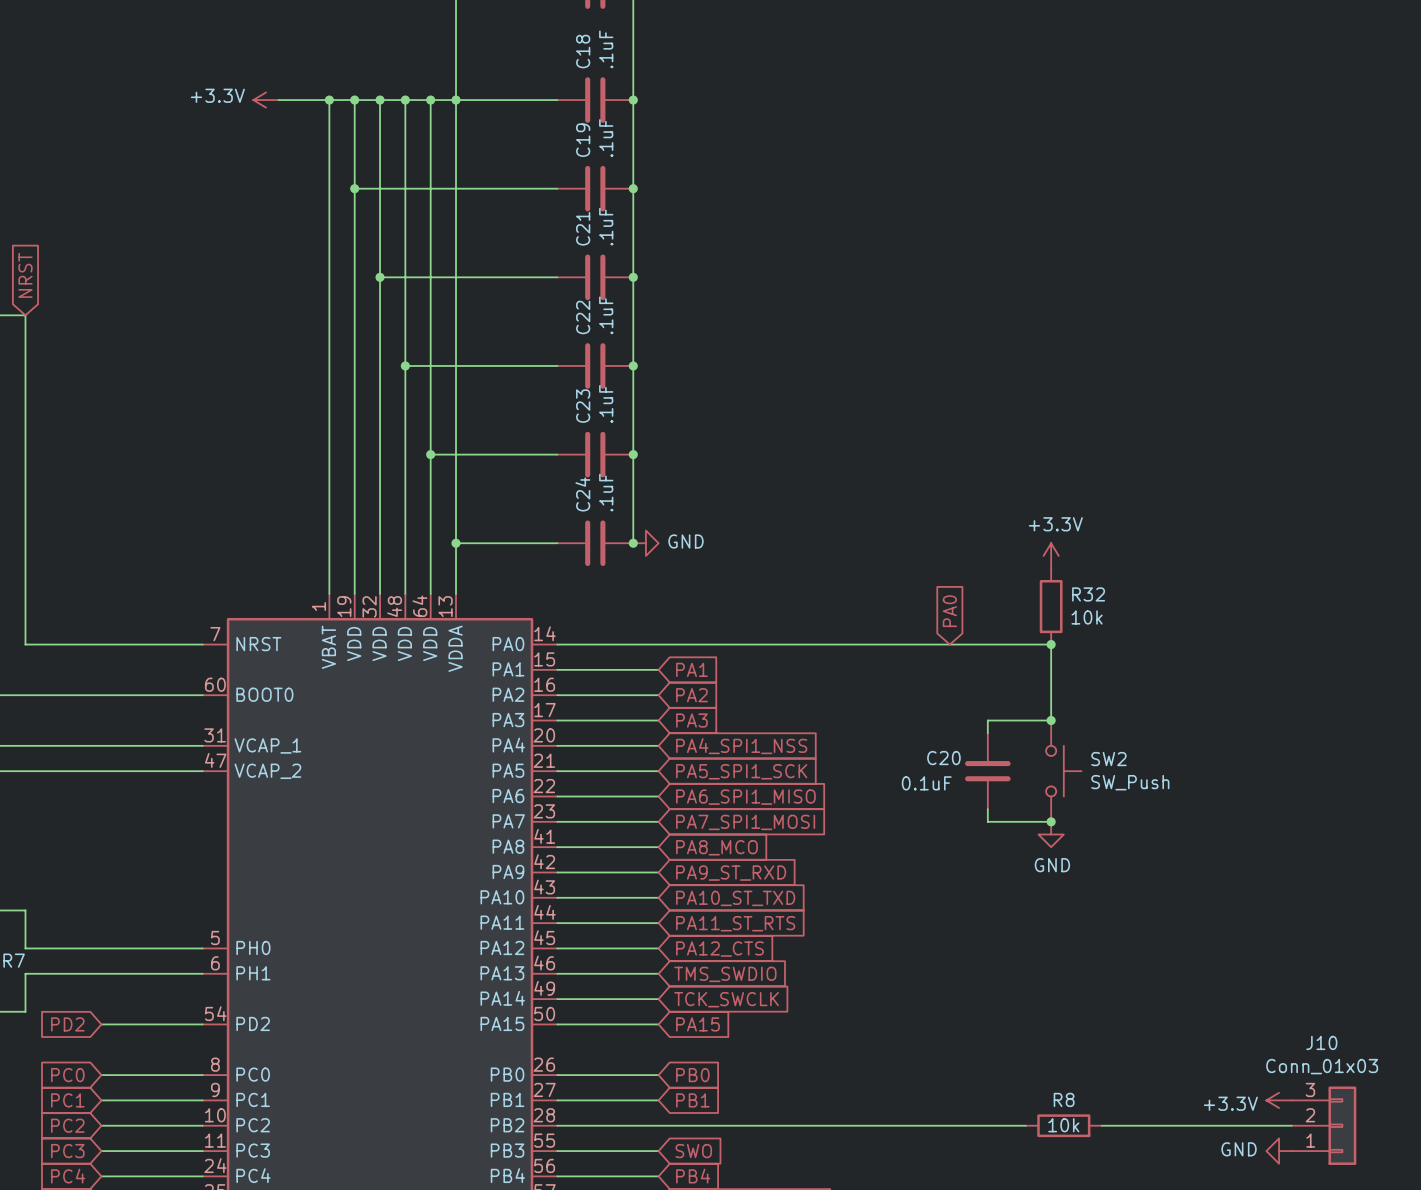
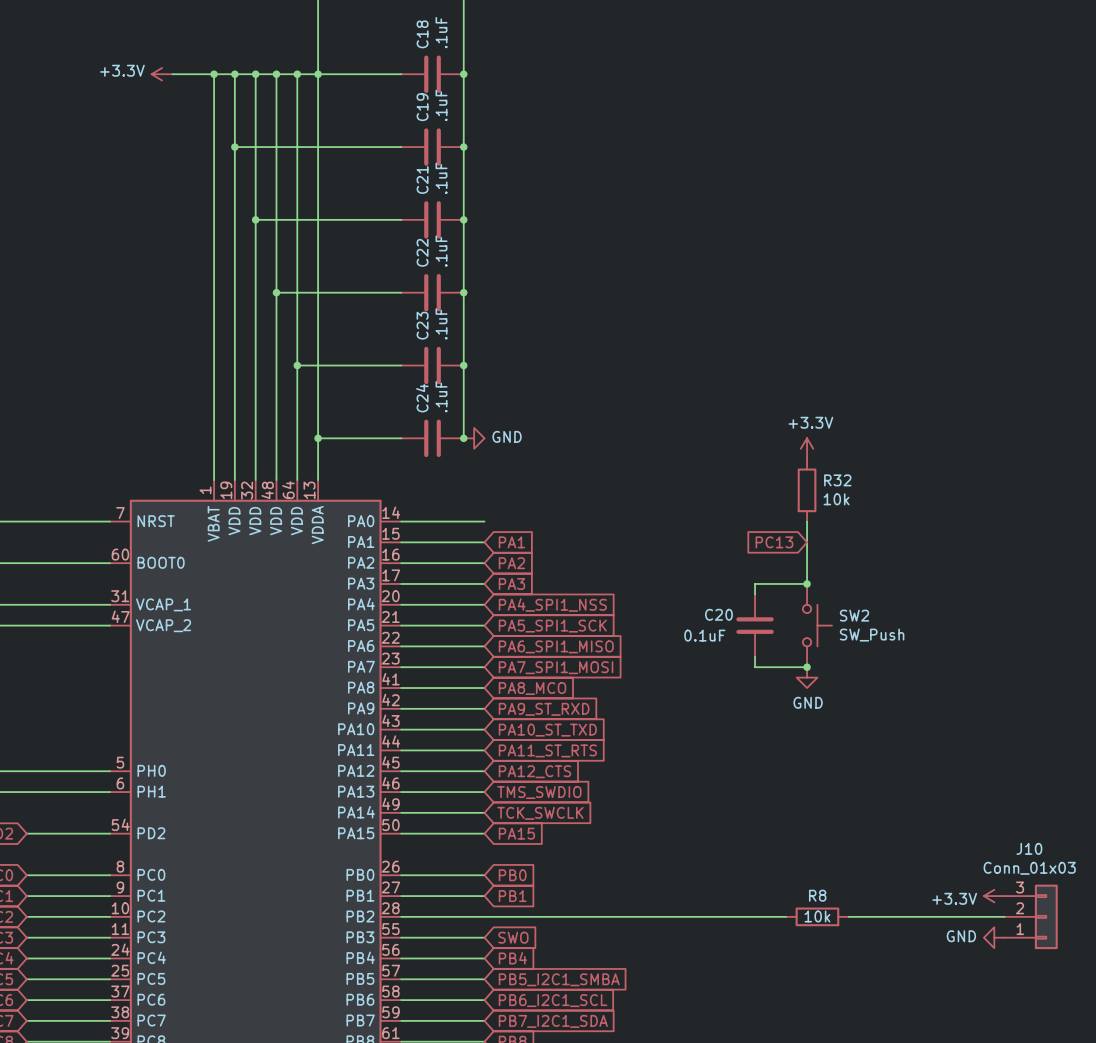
global label: PA0 (949, 611) -> none
wire: (658, 644) (1051, 644) -> none
junction: (1051, 644) -> none
global label: none -> PC13 (774, 542)

